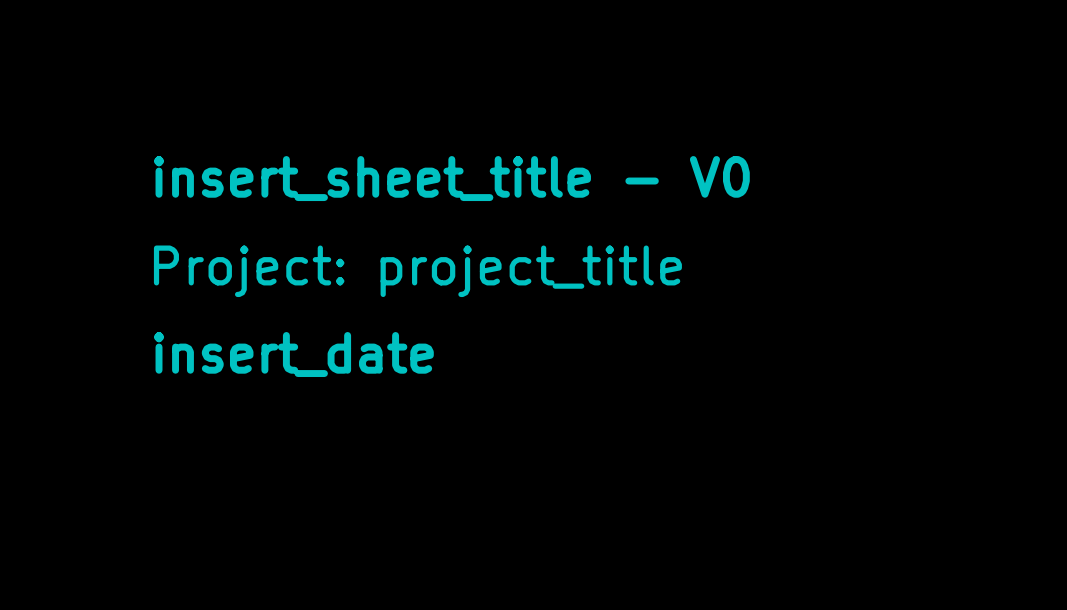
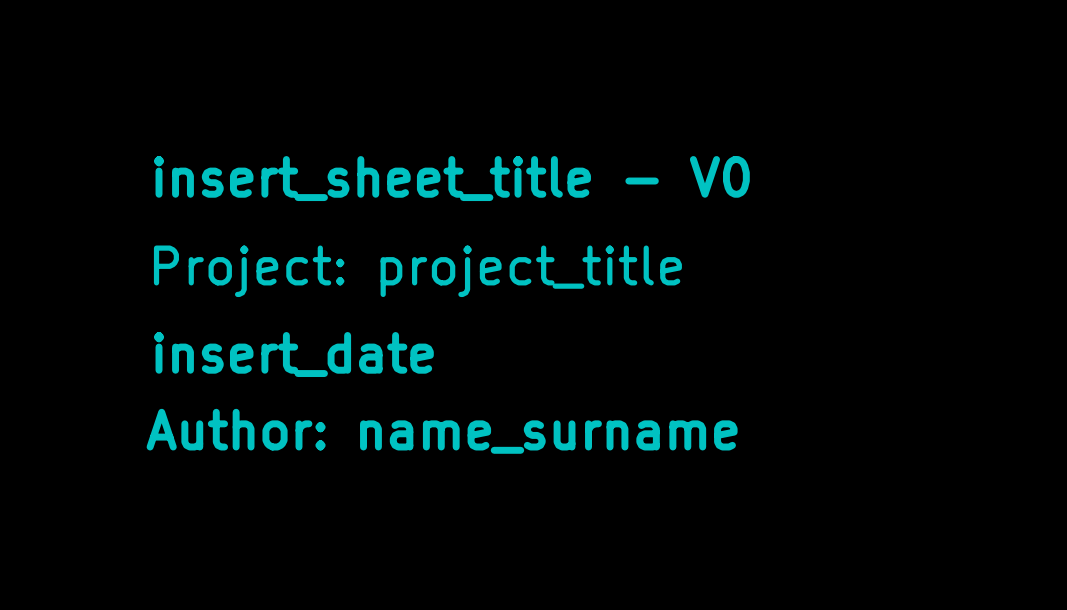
text: none -> Author: name_surname (442, 431)

